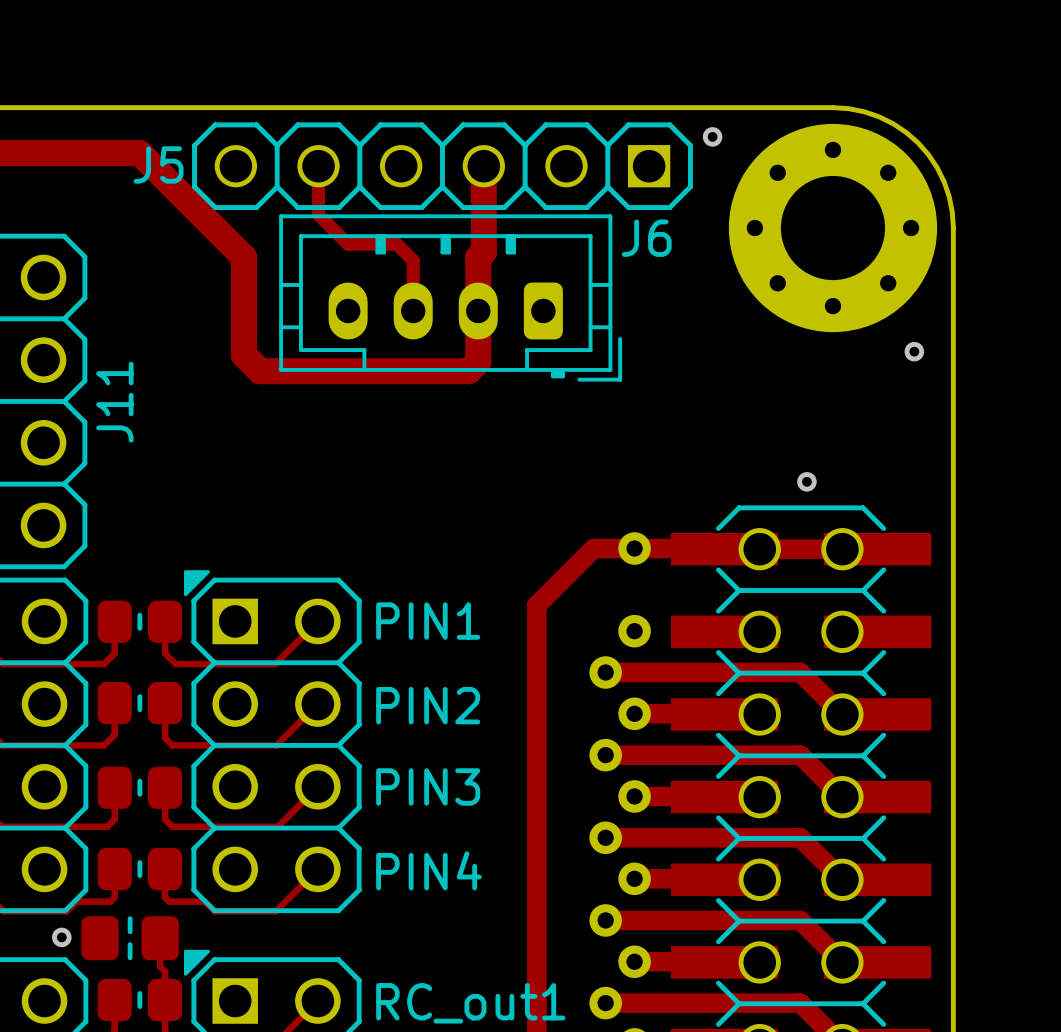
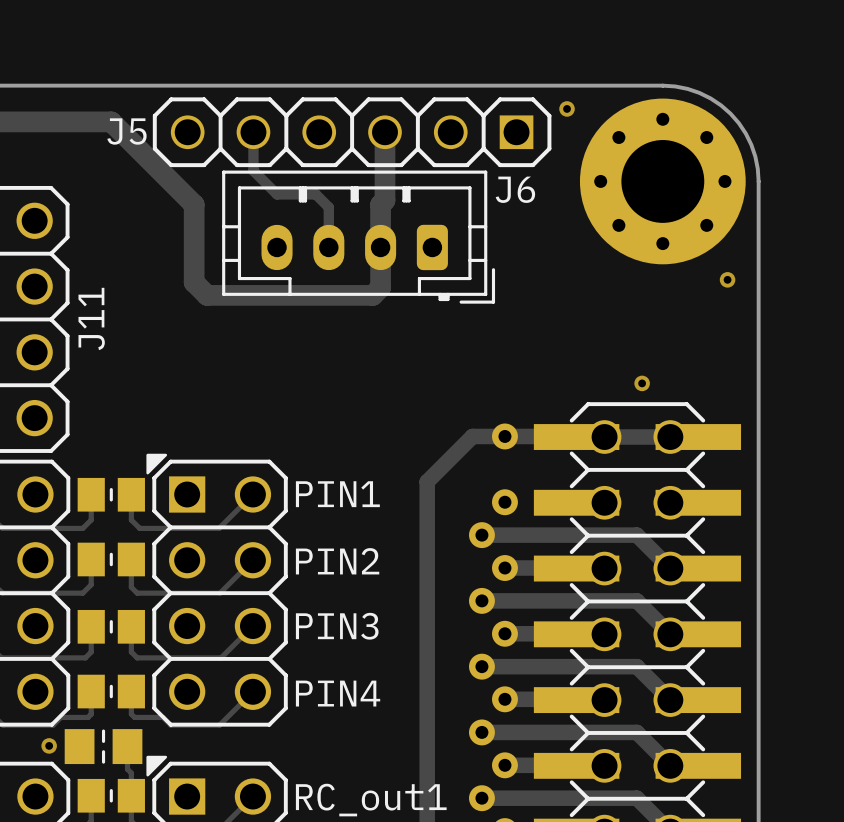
part footprint: [97, 600, 183, 643] -> [77, 477, 145, 512]
part footprint: [97, 681, 183, 725] -> [77, 542, 145, 577]
part footprint: [97, 766, 183, 809] -> [77, 609, 145, 644]
part footprint: [97, 847, 183, 891] -> [77, 674, 145, 709]
part footprint: [81, 916, 179, 961] -> [64, 729, 143, 765]
part footprint: [97, 978, 183, 1022] -> [77, 778, 145, 813]

